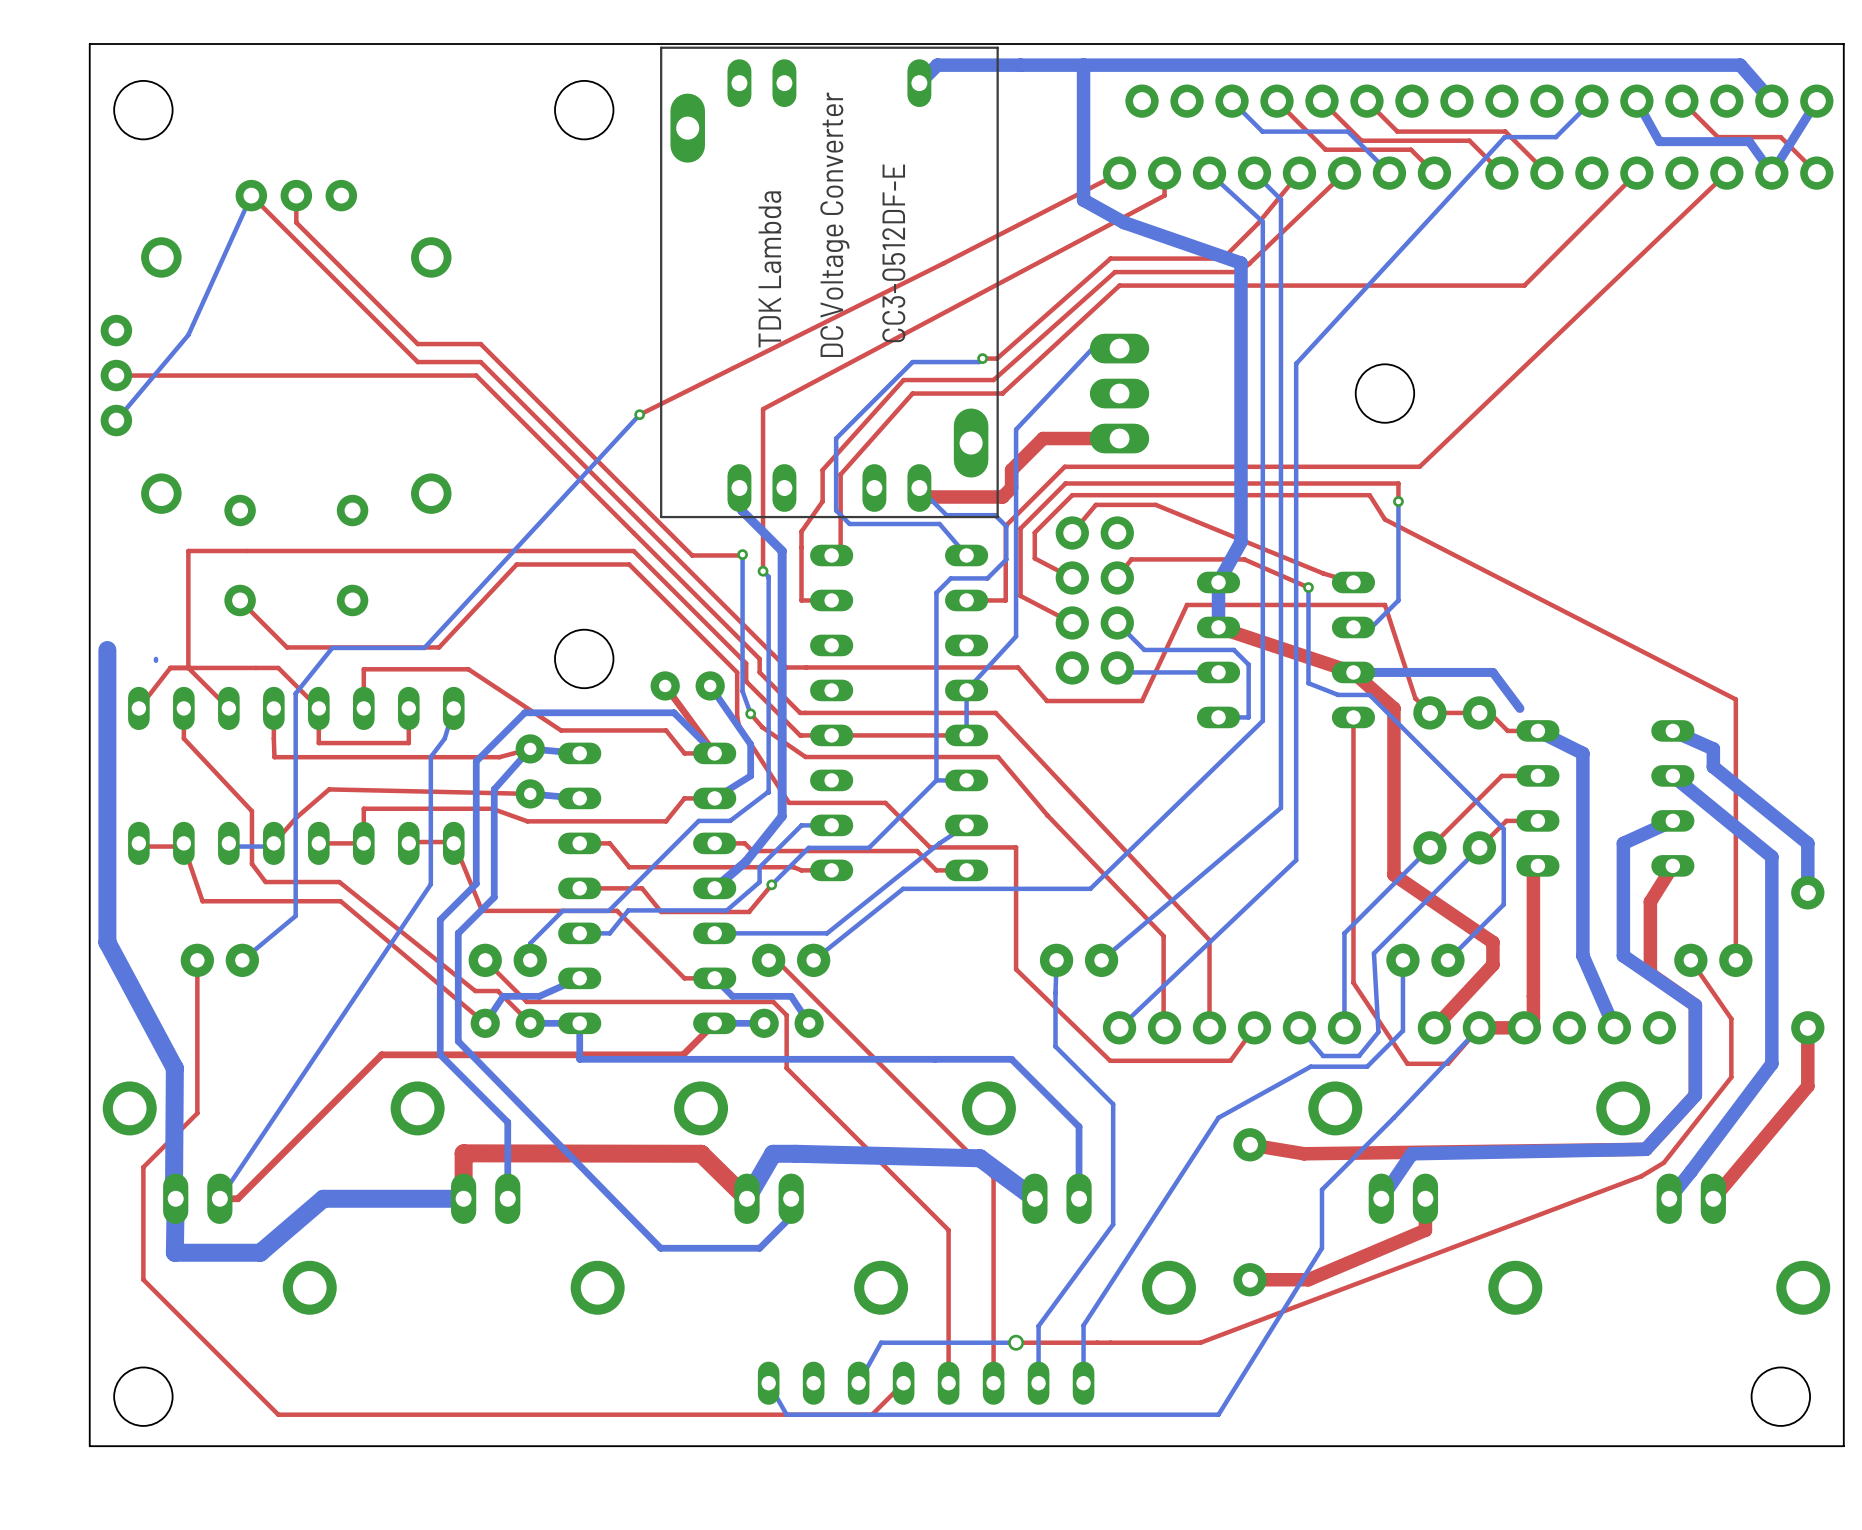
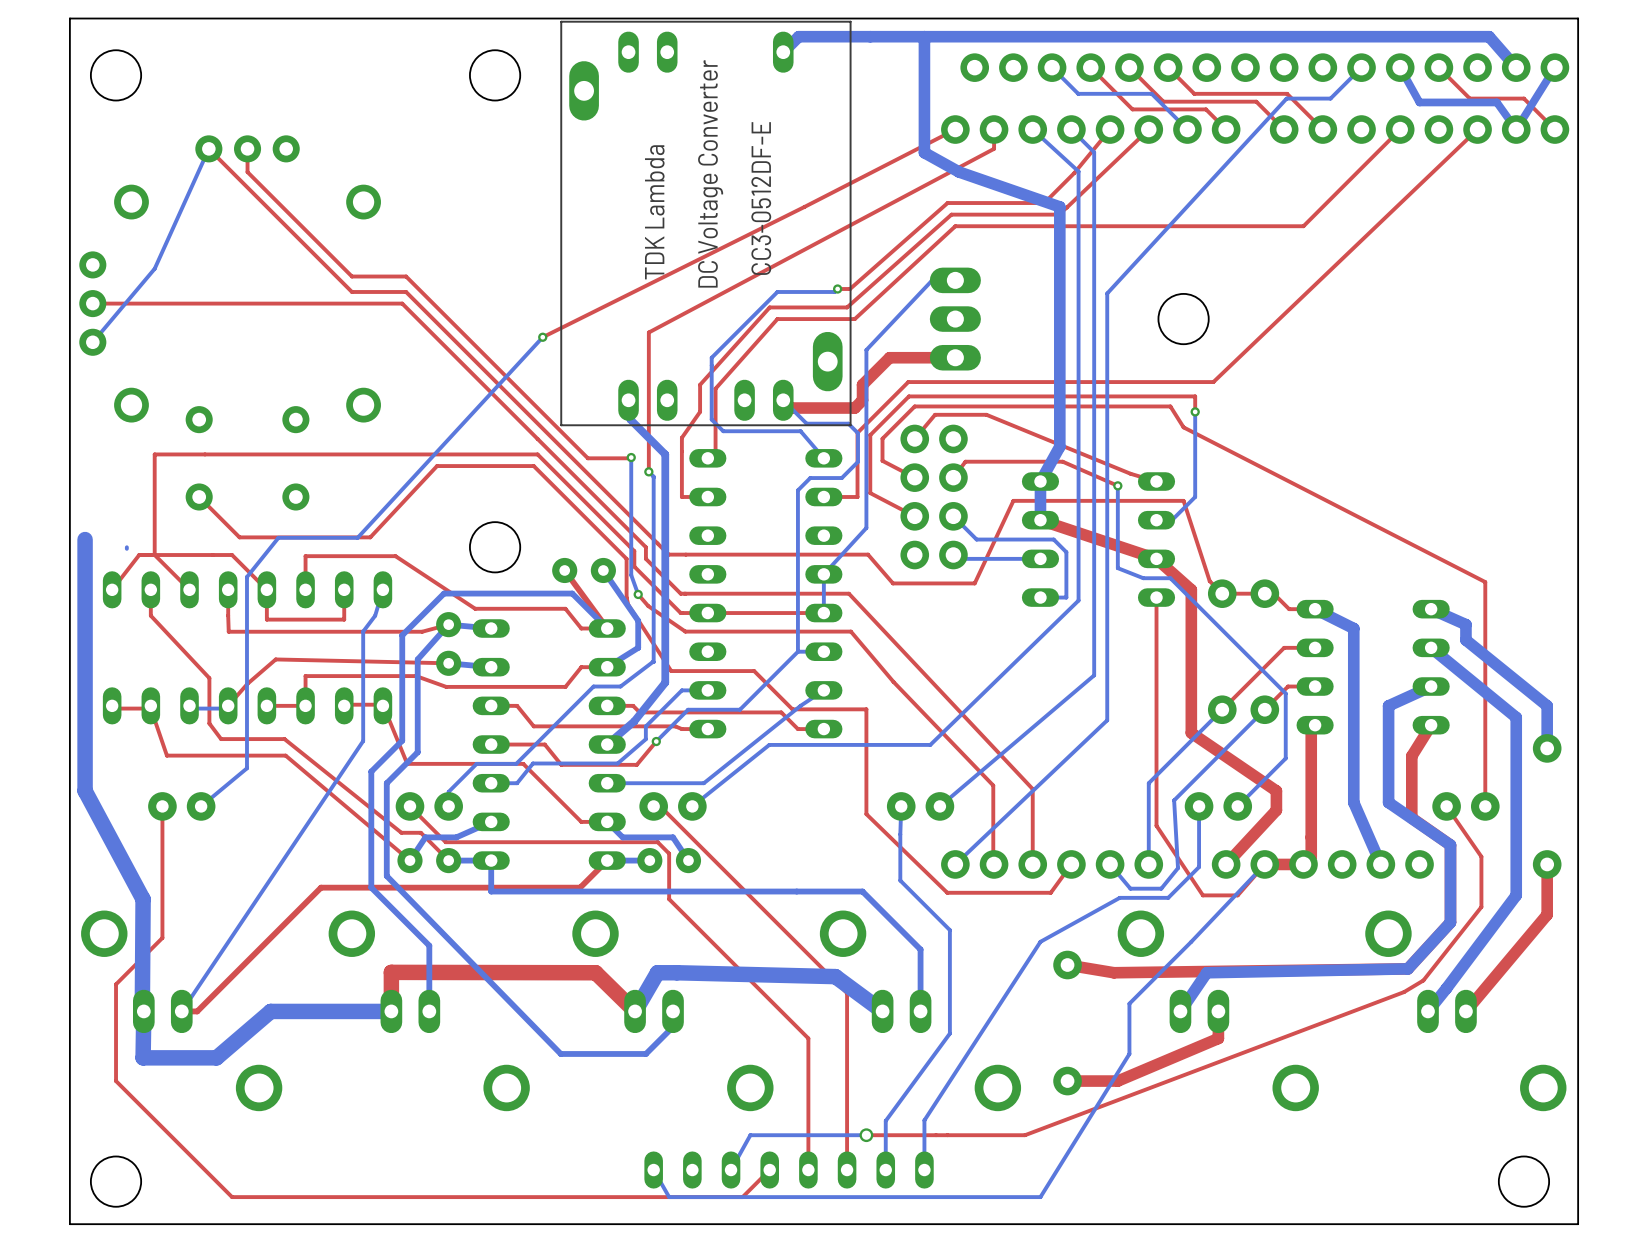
bottom track: (1353, 672) (1492, 672) (1519, 708) -> none

